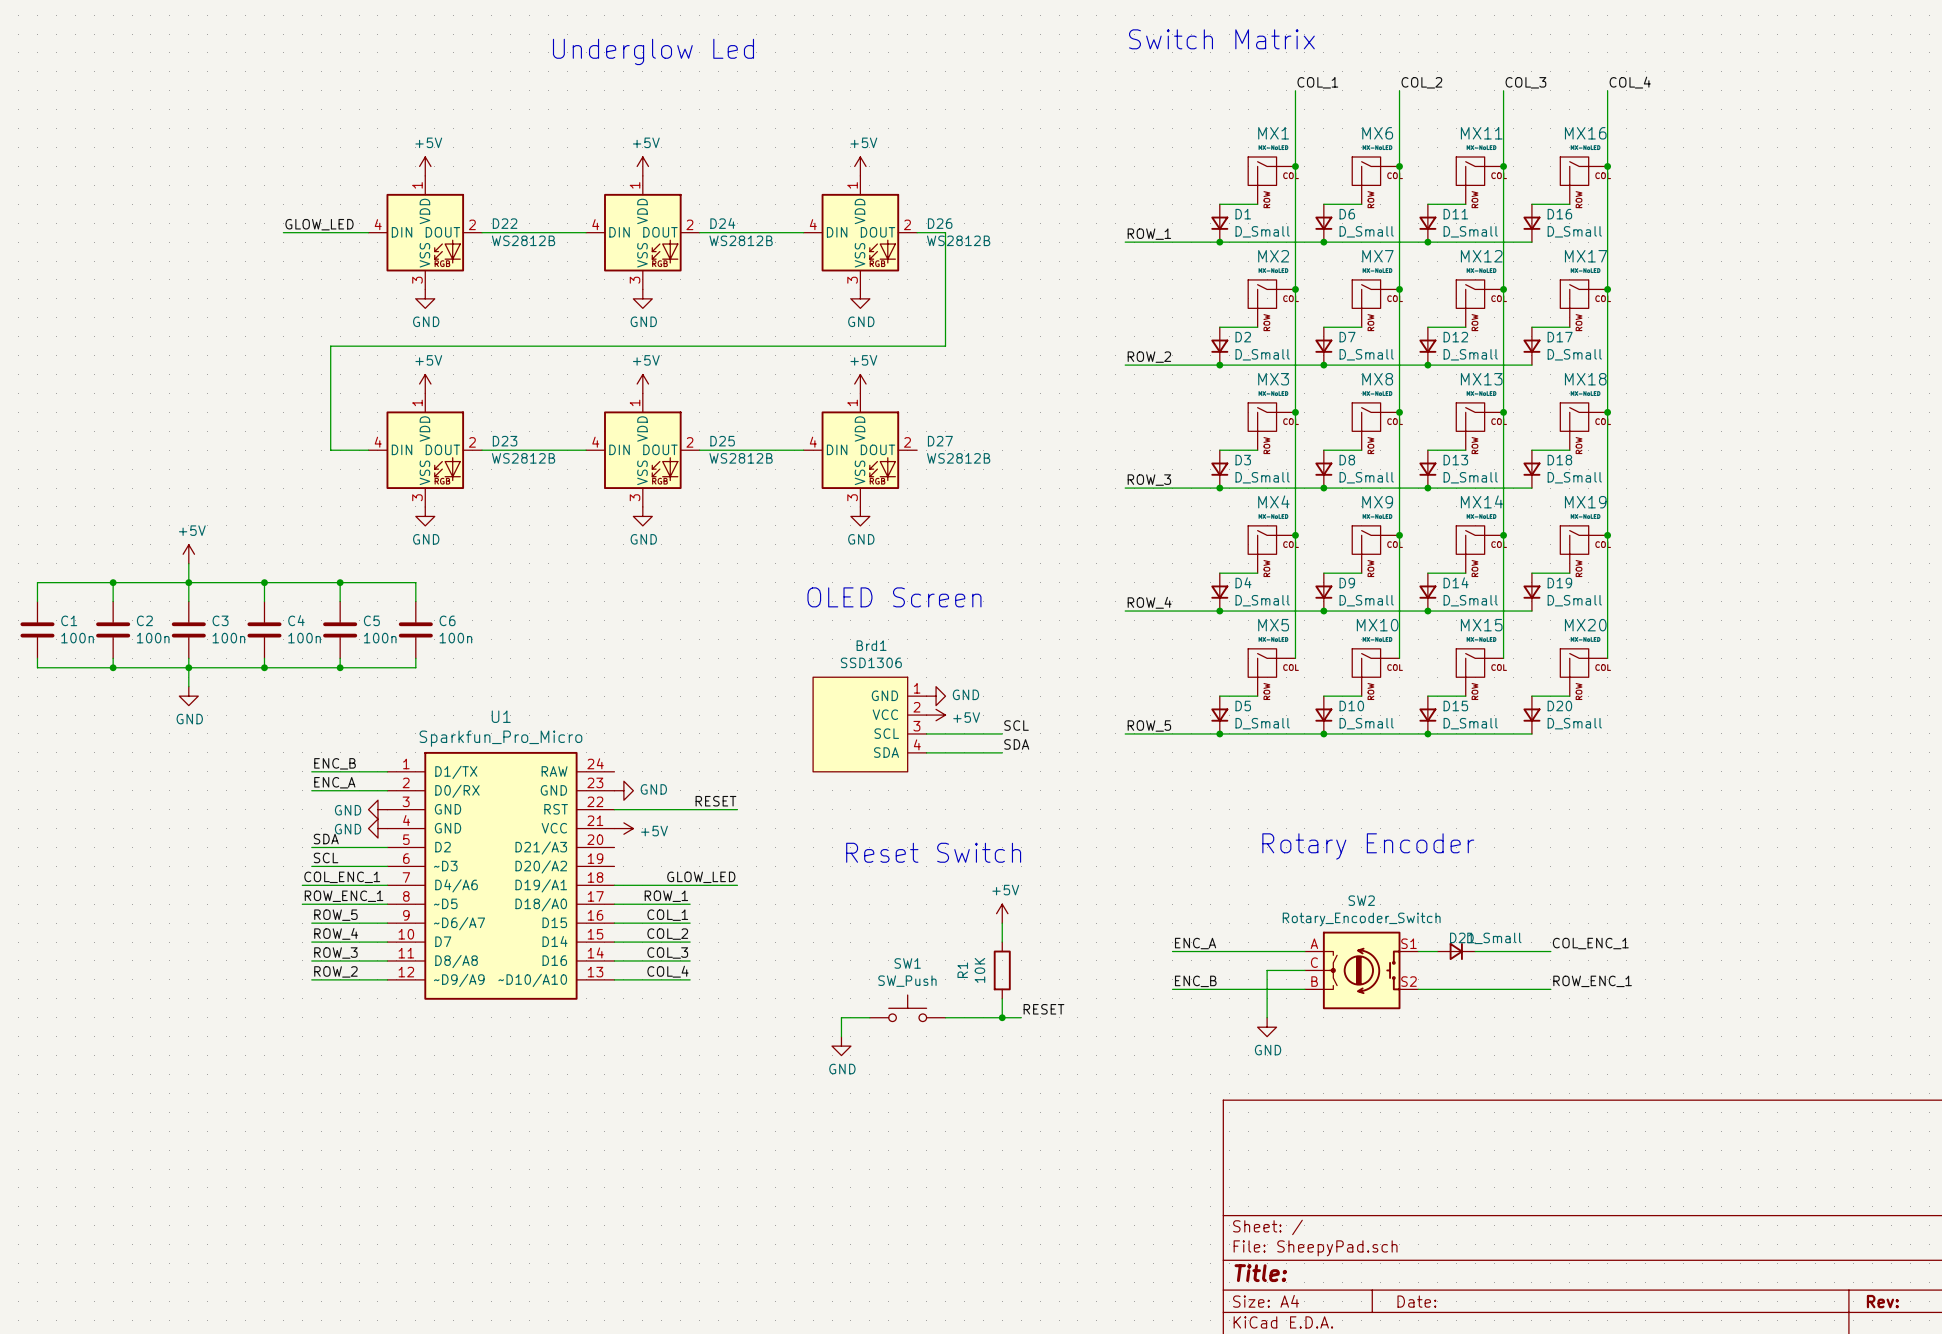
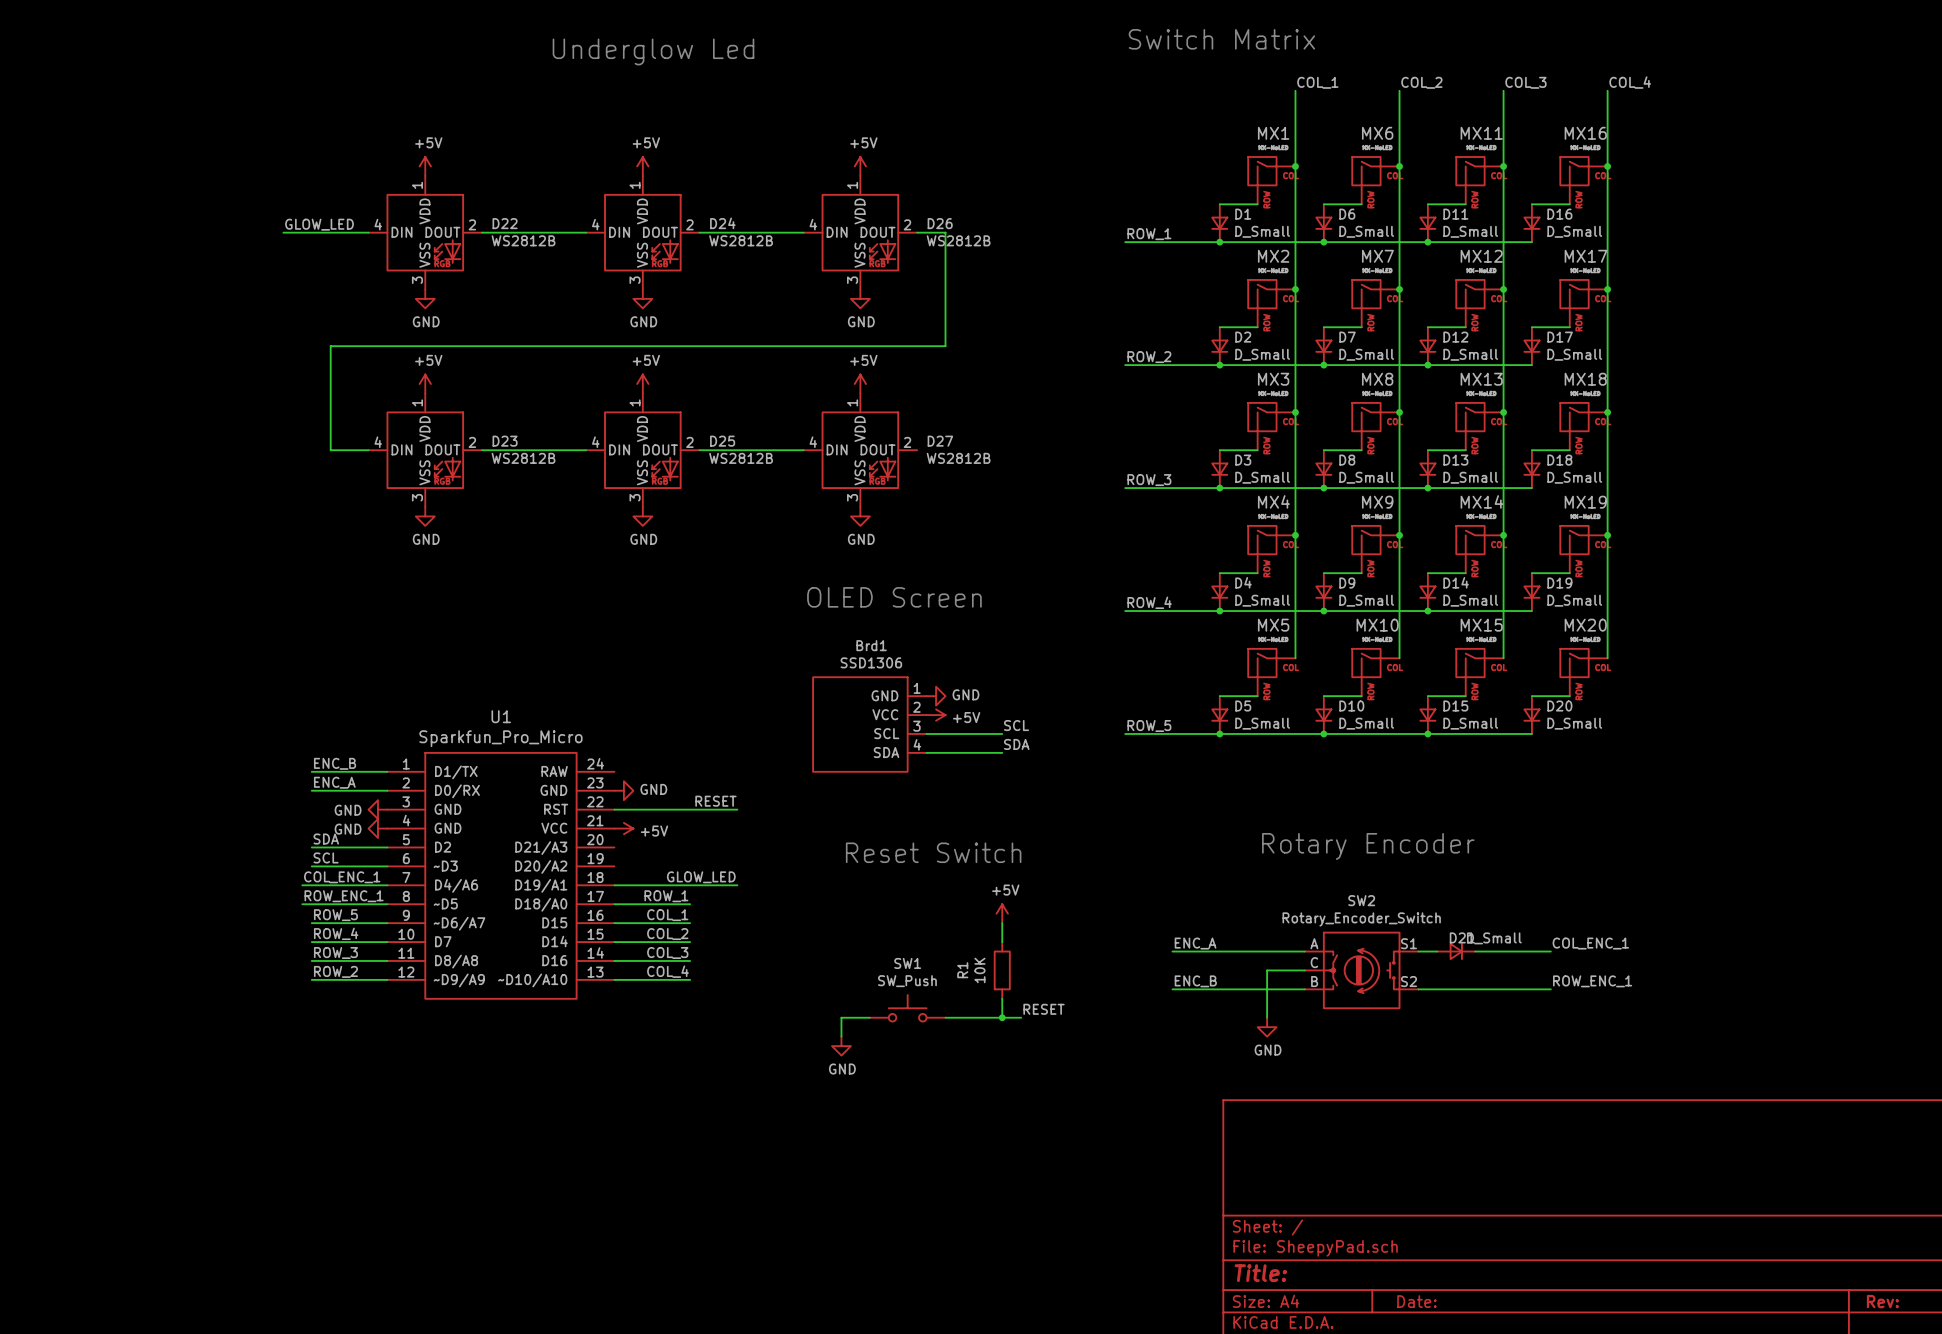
power symbol: +5V (188, 554) -> none
wire: (188, 563) (188, 601) -> none
wire: (113, 582) (113, 601) -> none
junction: (113, 582) -> none
junction: (188, 582) -> none
wire: (264, 582) (264, 601) -> none
junction: (264, 582) -> none
wire: (340, 582) (340, 601) -> none
junction: (340, 582) -> none
wire: (37, 601) (37, 582) (415, 582) (415, 601) -> none
C1: 100n (37, 629) -> none
C2: 100n (113, 629) -> none
C3: 100n (188, 629) -> none
C4: 100n (264, 629) -> none
C5: 100n (340, 629) -> none
C6: 100n (415, 629) -> none
wire: (37, 658) (37, 667) (415, 667) (415, 658) -> none
wire: (113, 658) (113, 667) -> none
wire: (188, 658) (188, 686) -> none
wire: (264, 658) (264, 667) -> none
wire: (340, 658) (340, 667) -> none
junction: (113, 667) -> none
junction: (188, 667) -> none
junction: (264, 667) -> none
junction: (340, 667) -> none
power symbol: GND (188, 696) -> none

